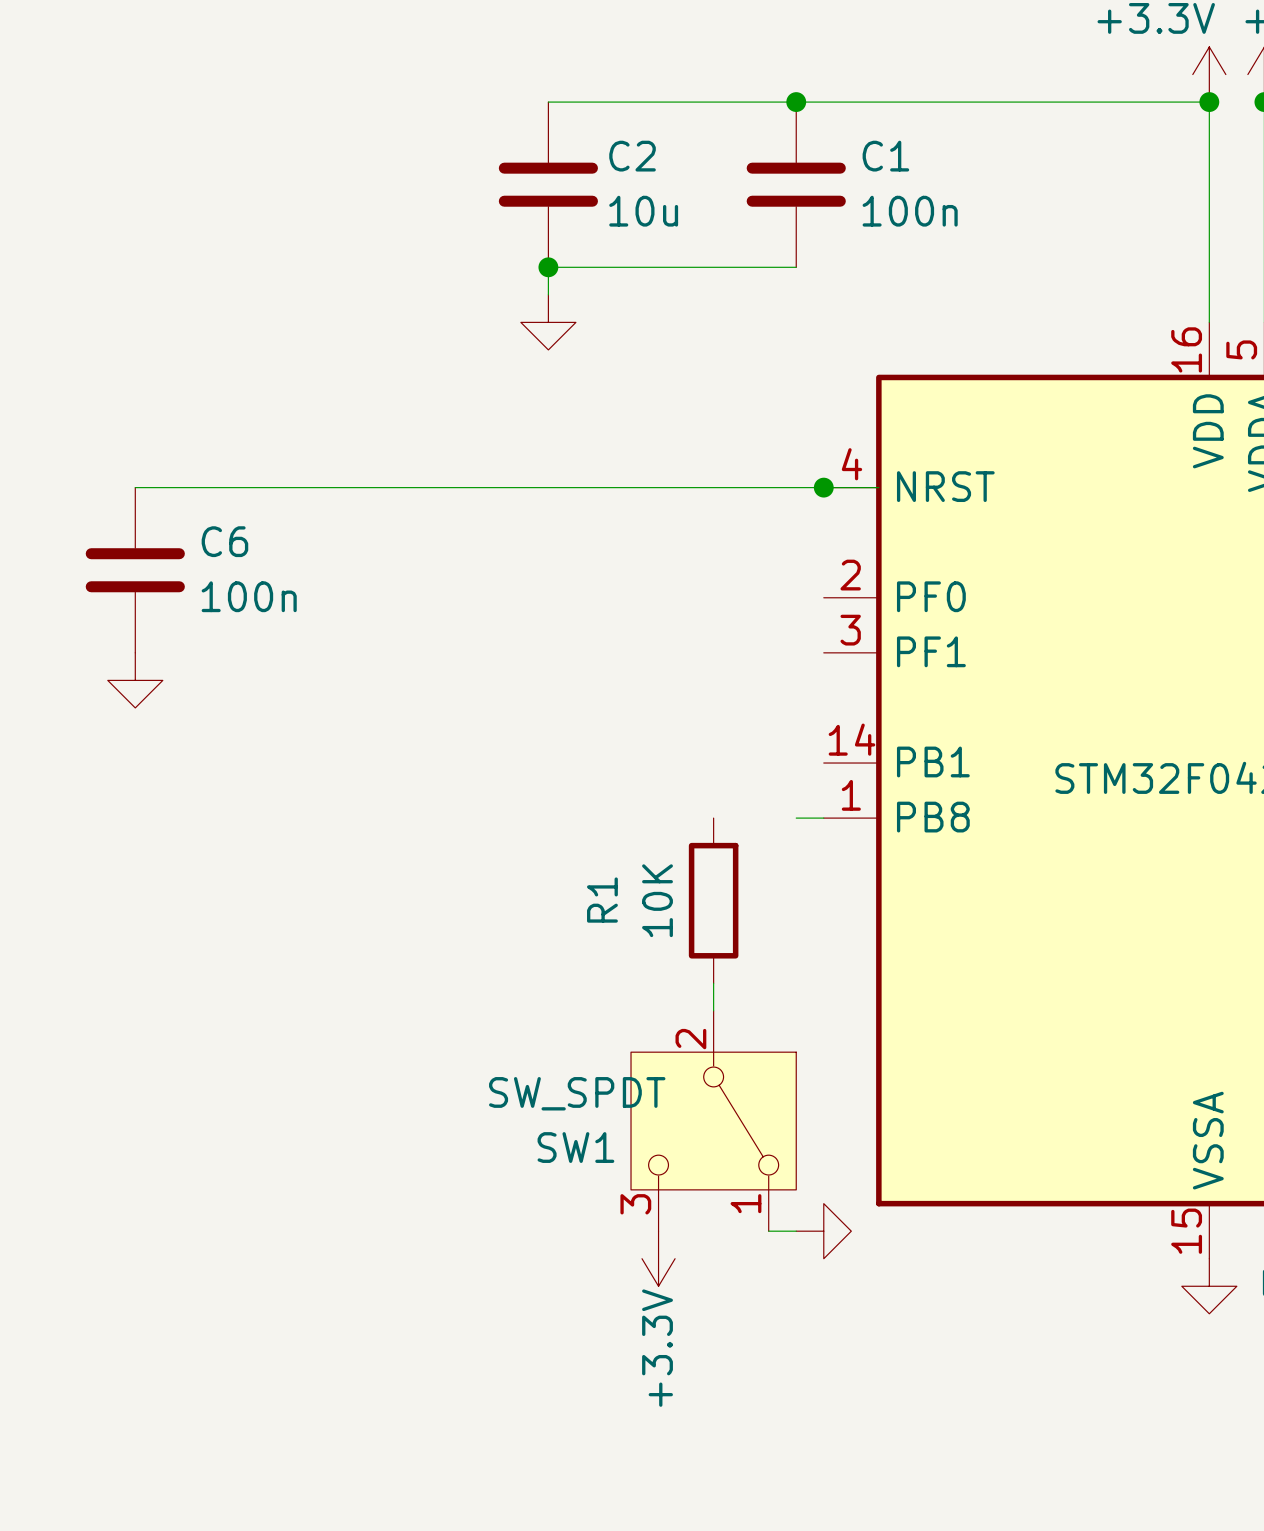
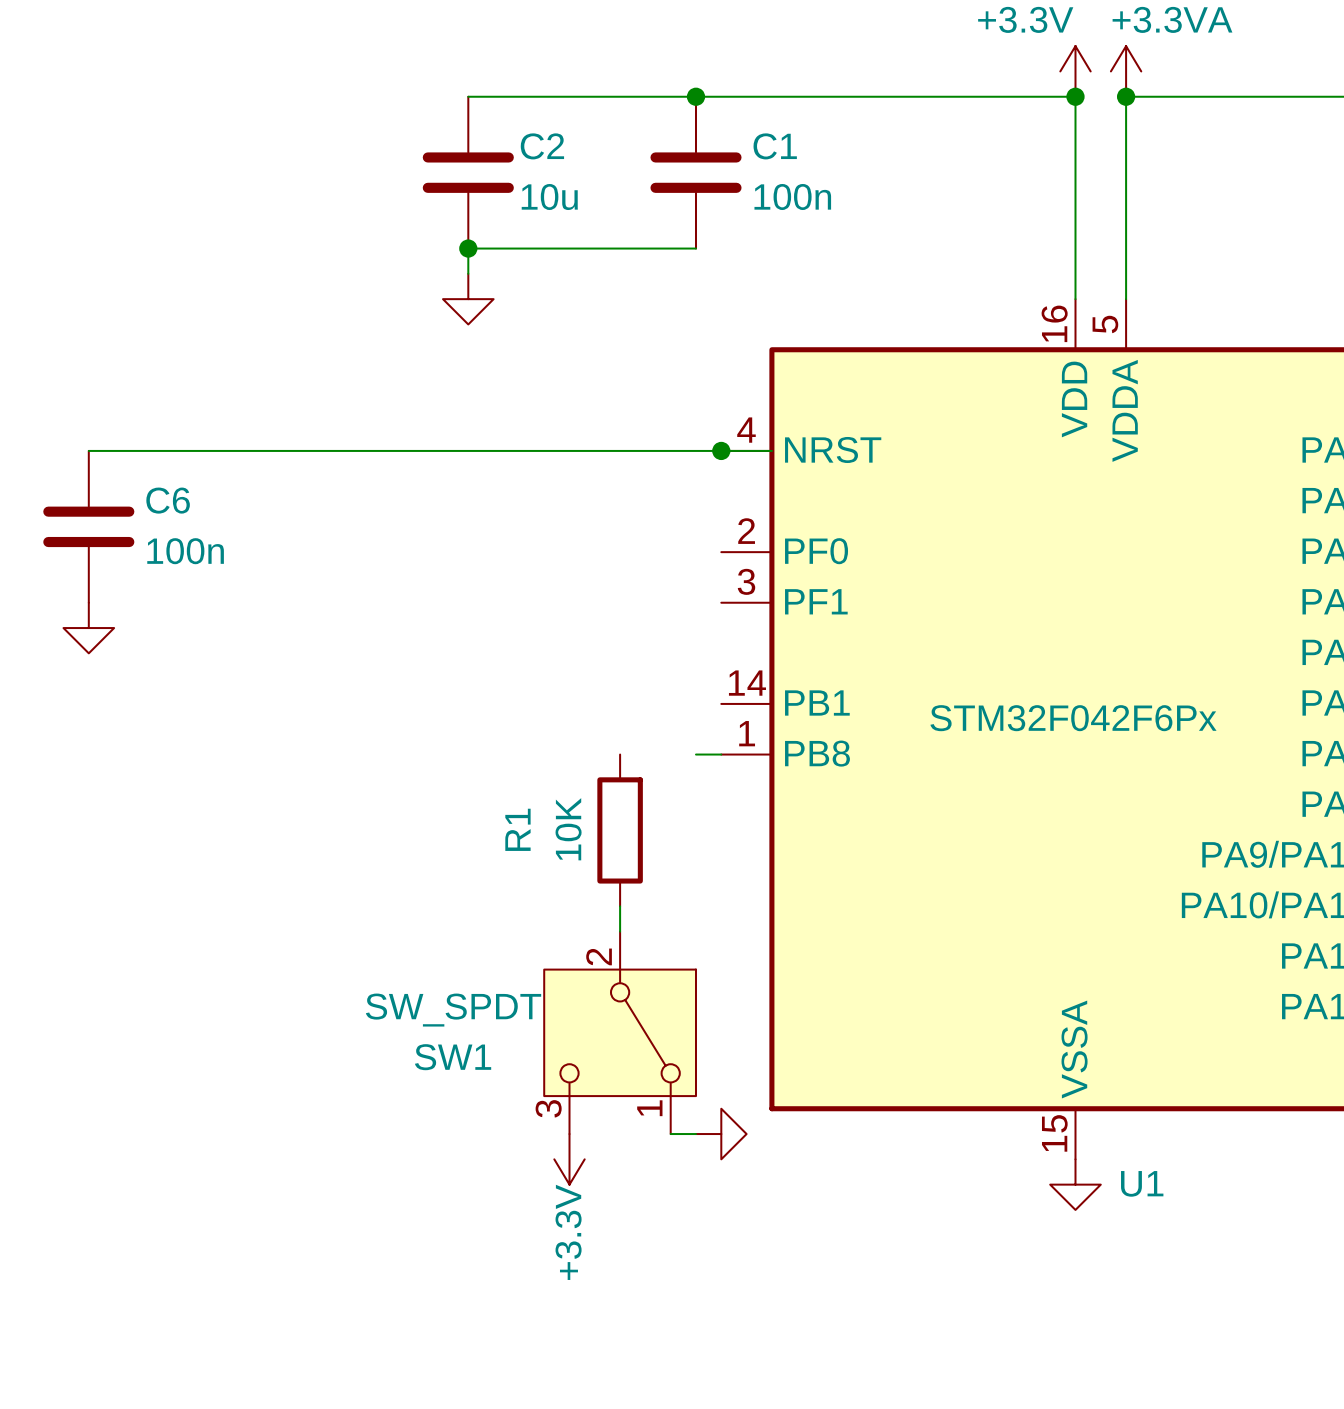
SW1 value position: SW_SPDT (577, 1093) -> SW_SPDT (453, 1010)
SW1 name position: SW1 (575, 1147) -> SW1 (453, 1057)

